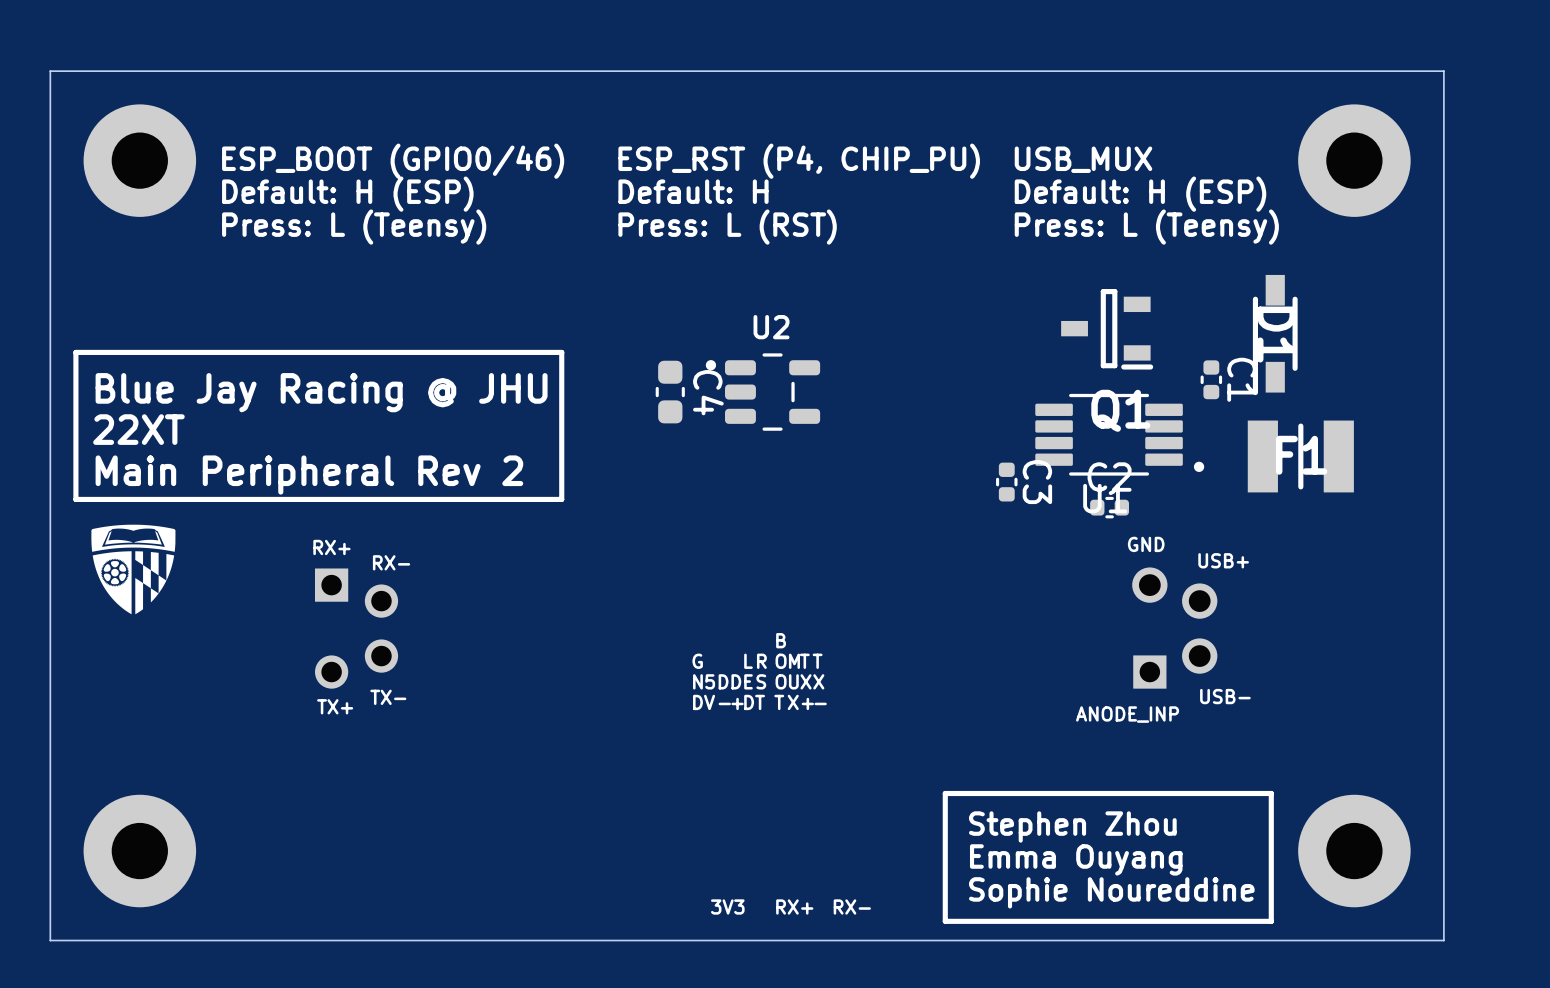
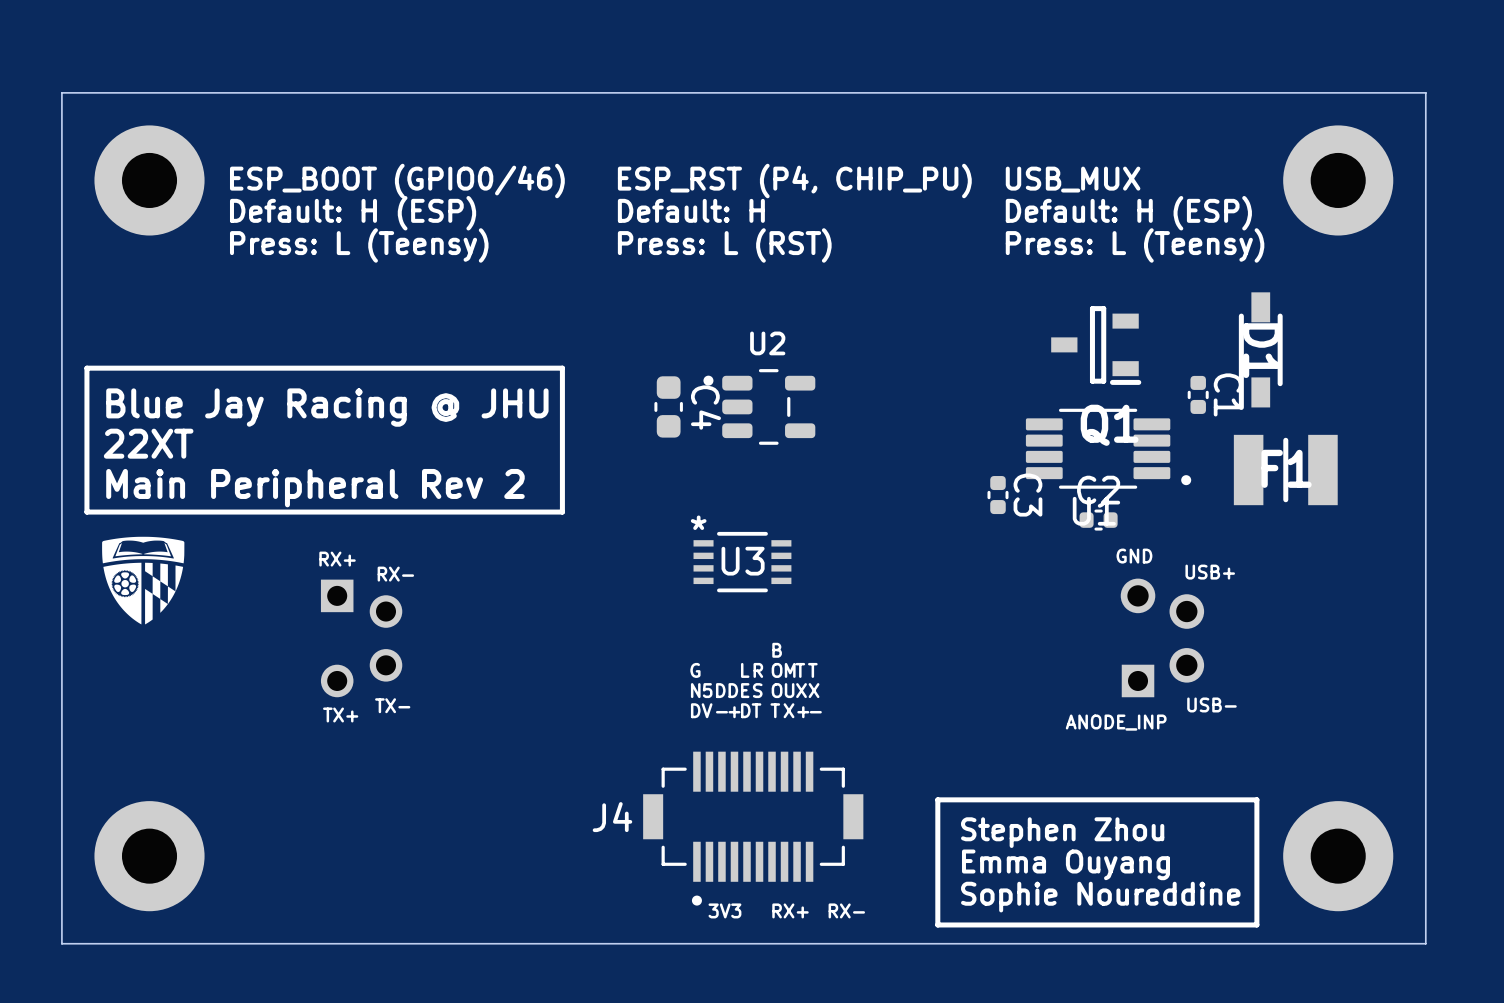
U3: none -> (742, 562)
J4: none -> (753, 828)

